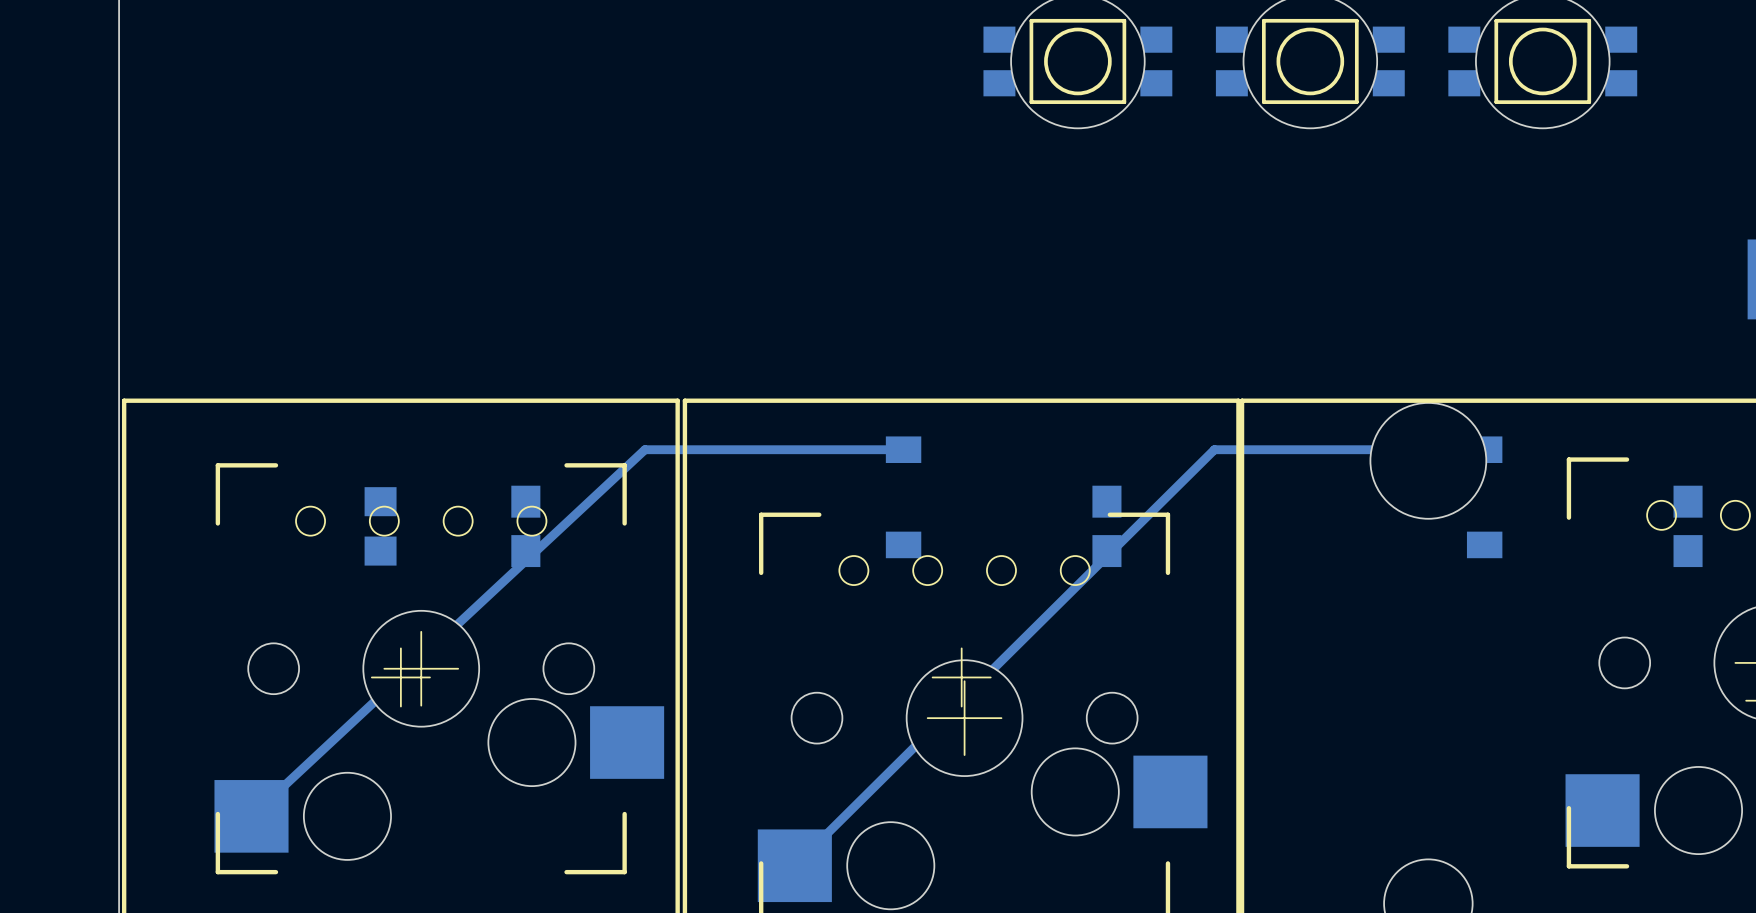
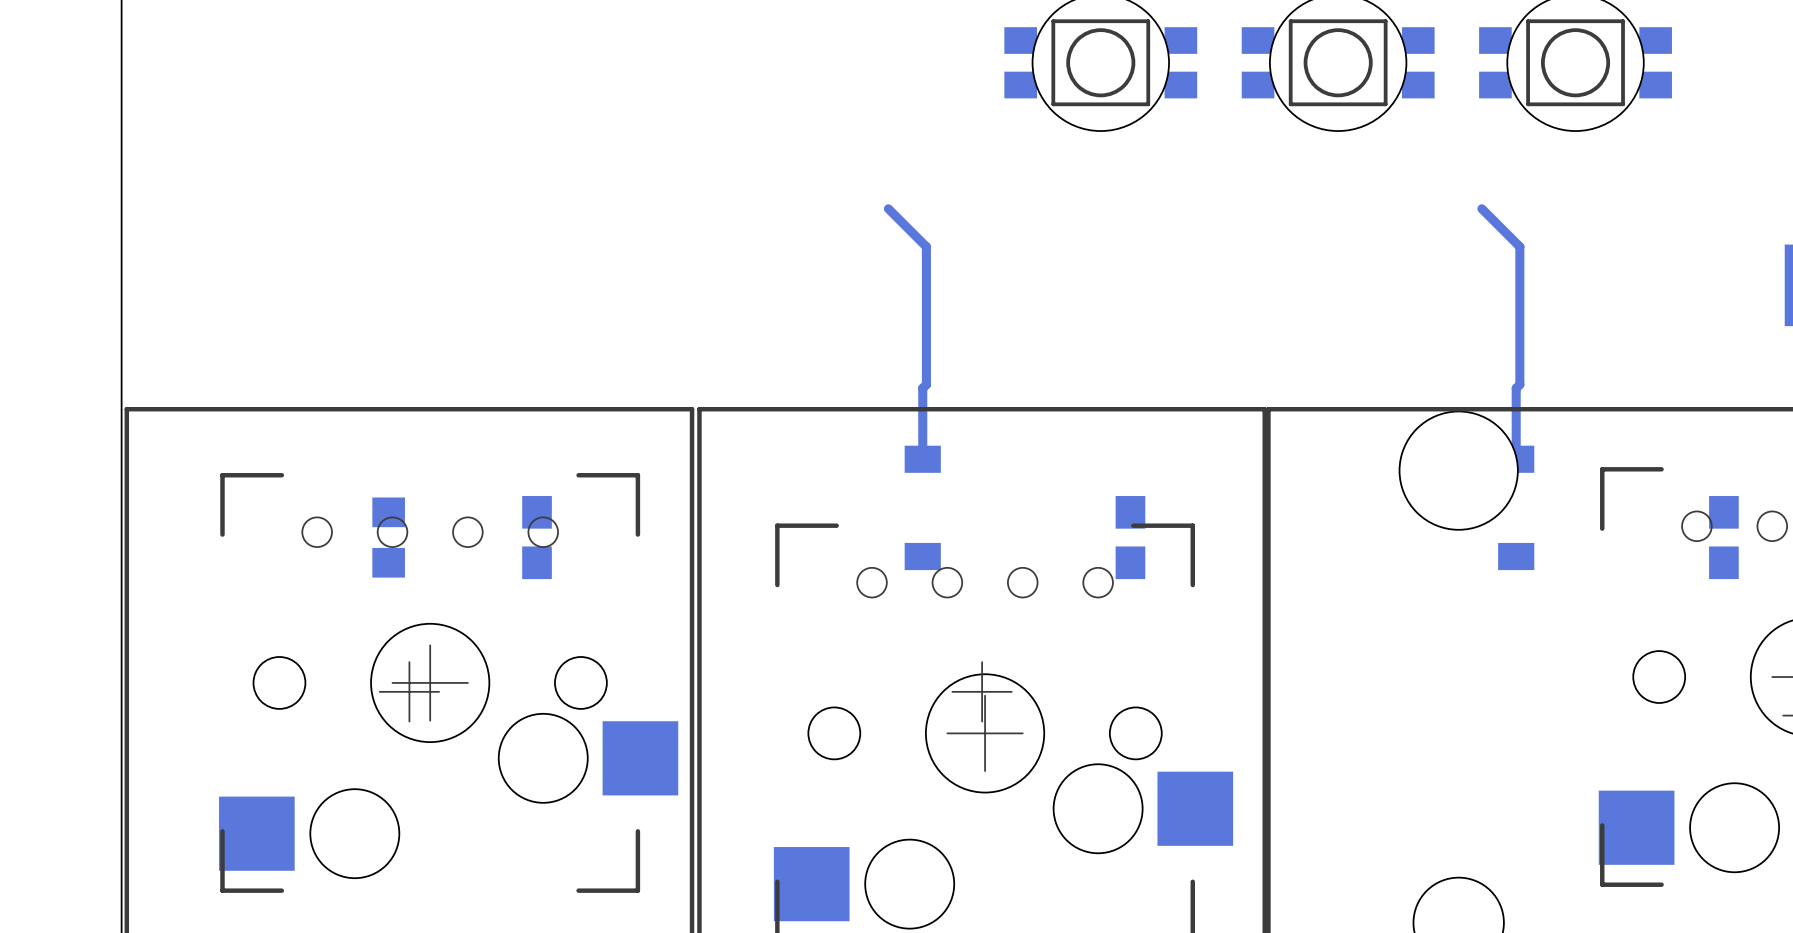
bottom track: (903, 449) (644, 449) (251, 816) -> (922, 459) (922, 388) (926, 384) (926, 246) (888, 208)
bottom track: (1484, 449) (1214, 449) (794, 865) -> (1516, 459) (1516, 388) (1519, 384) (1519, 246) (1481, 208)

